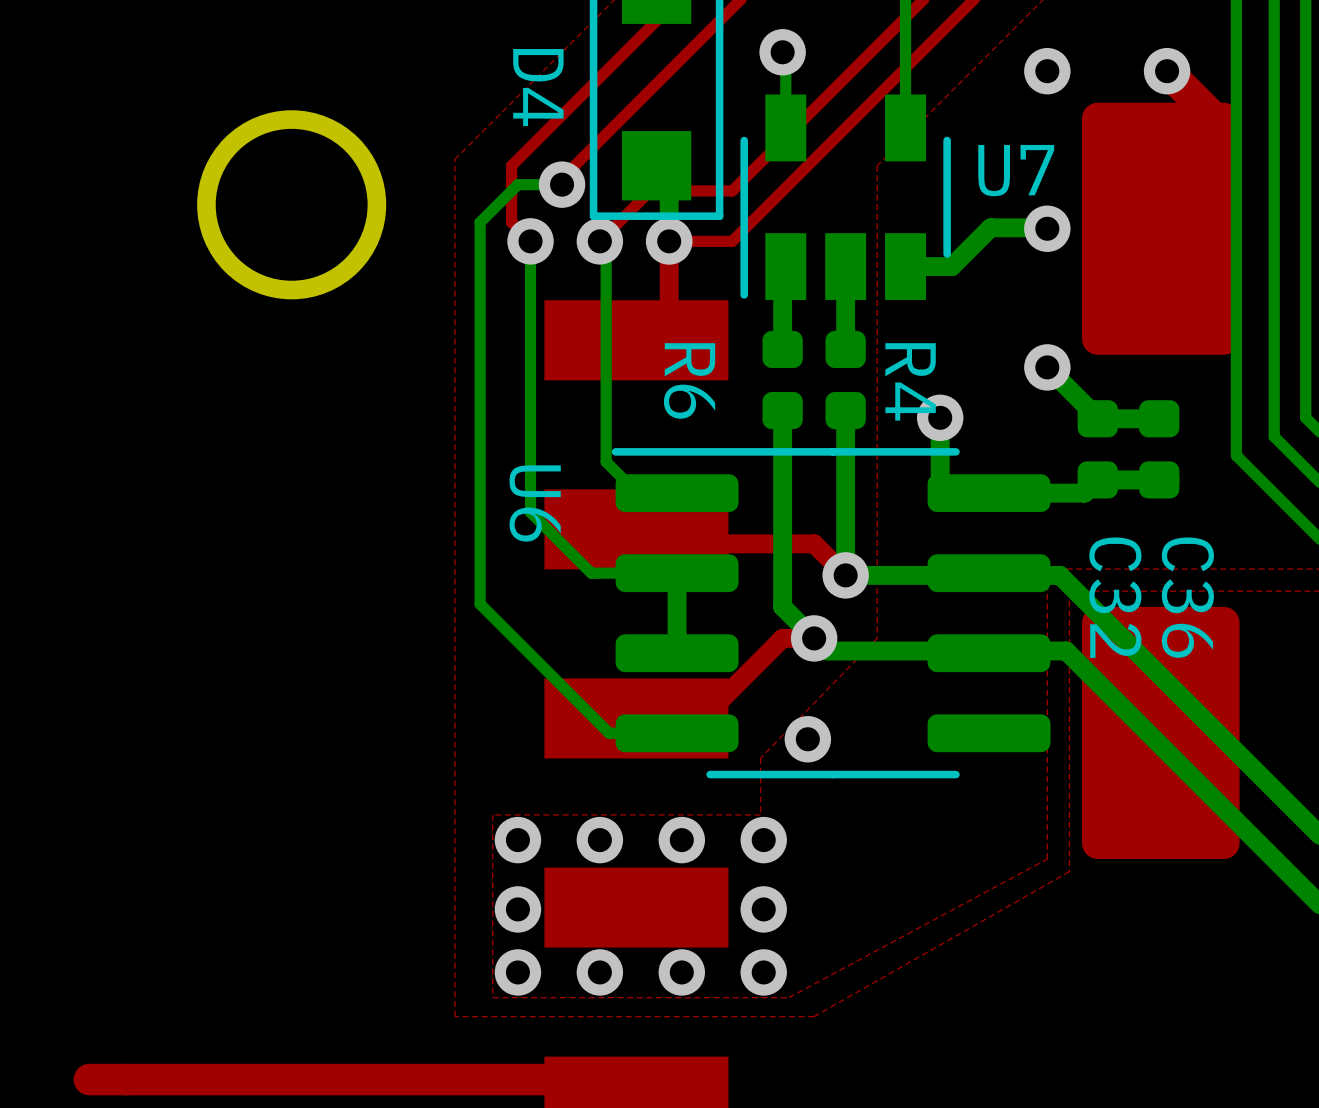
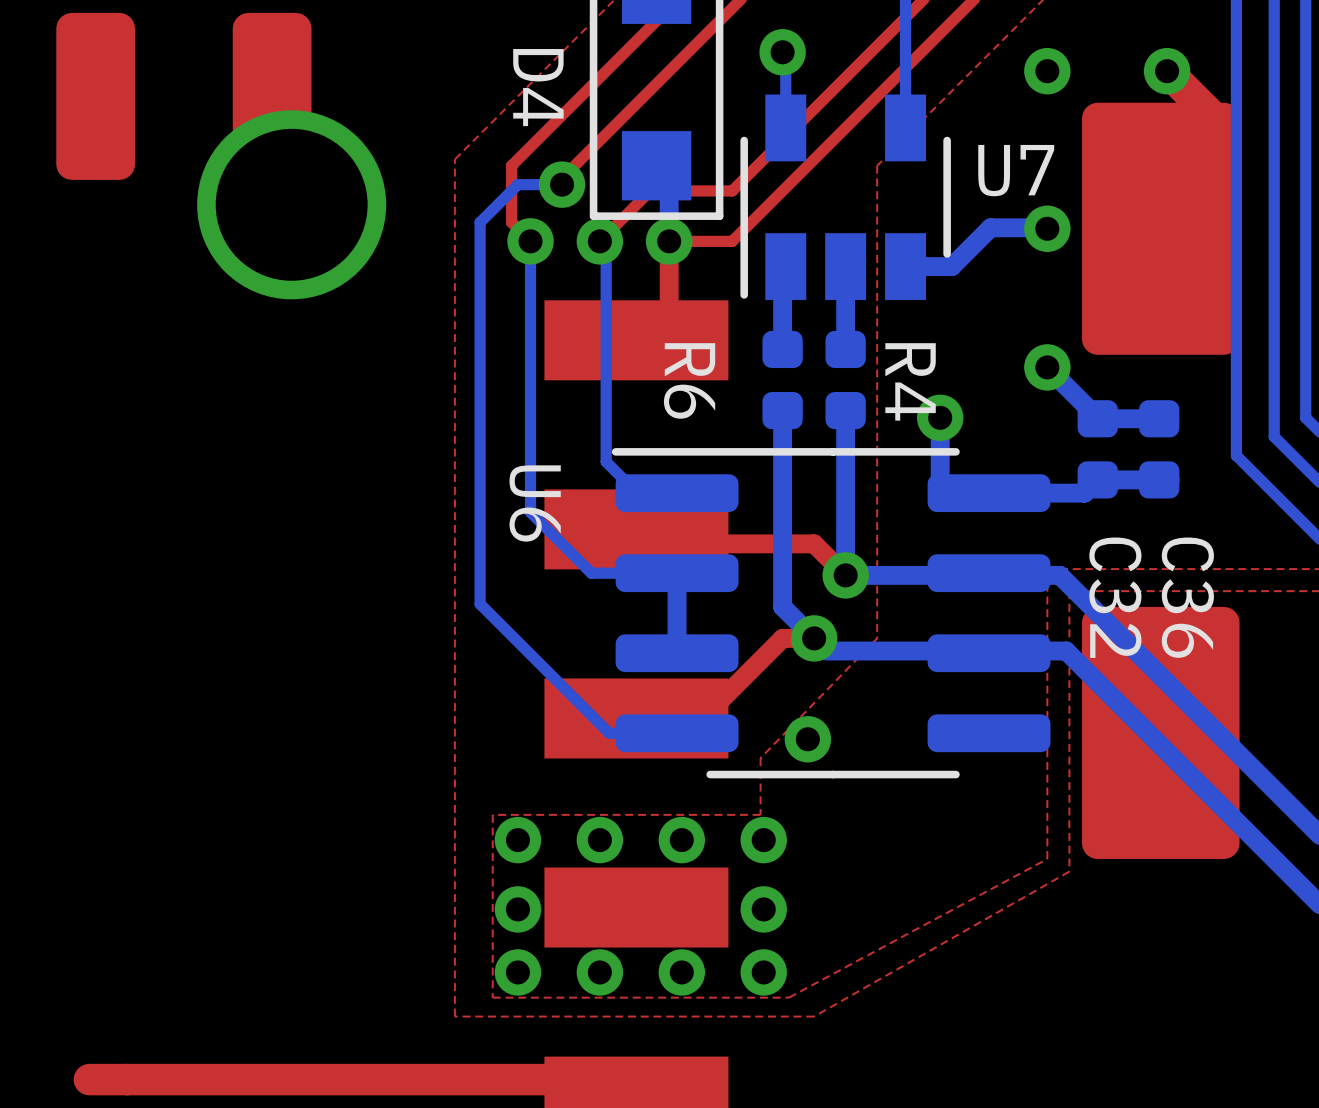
part: none -> (183, 96)

